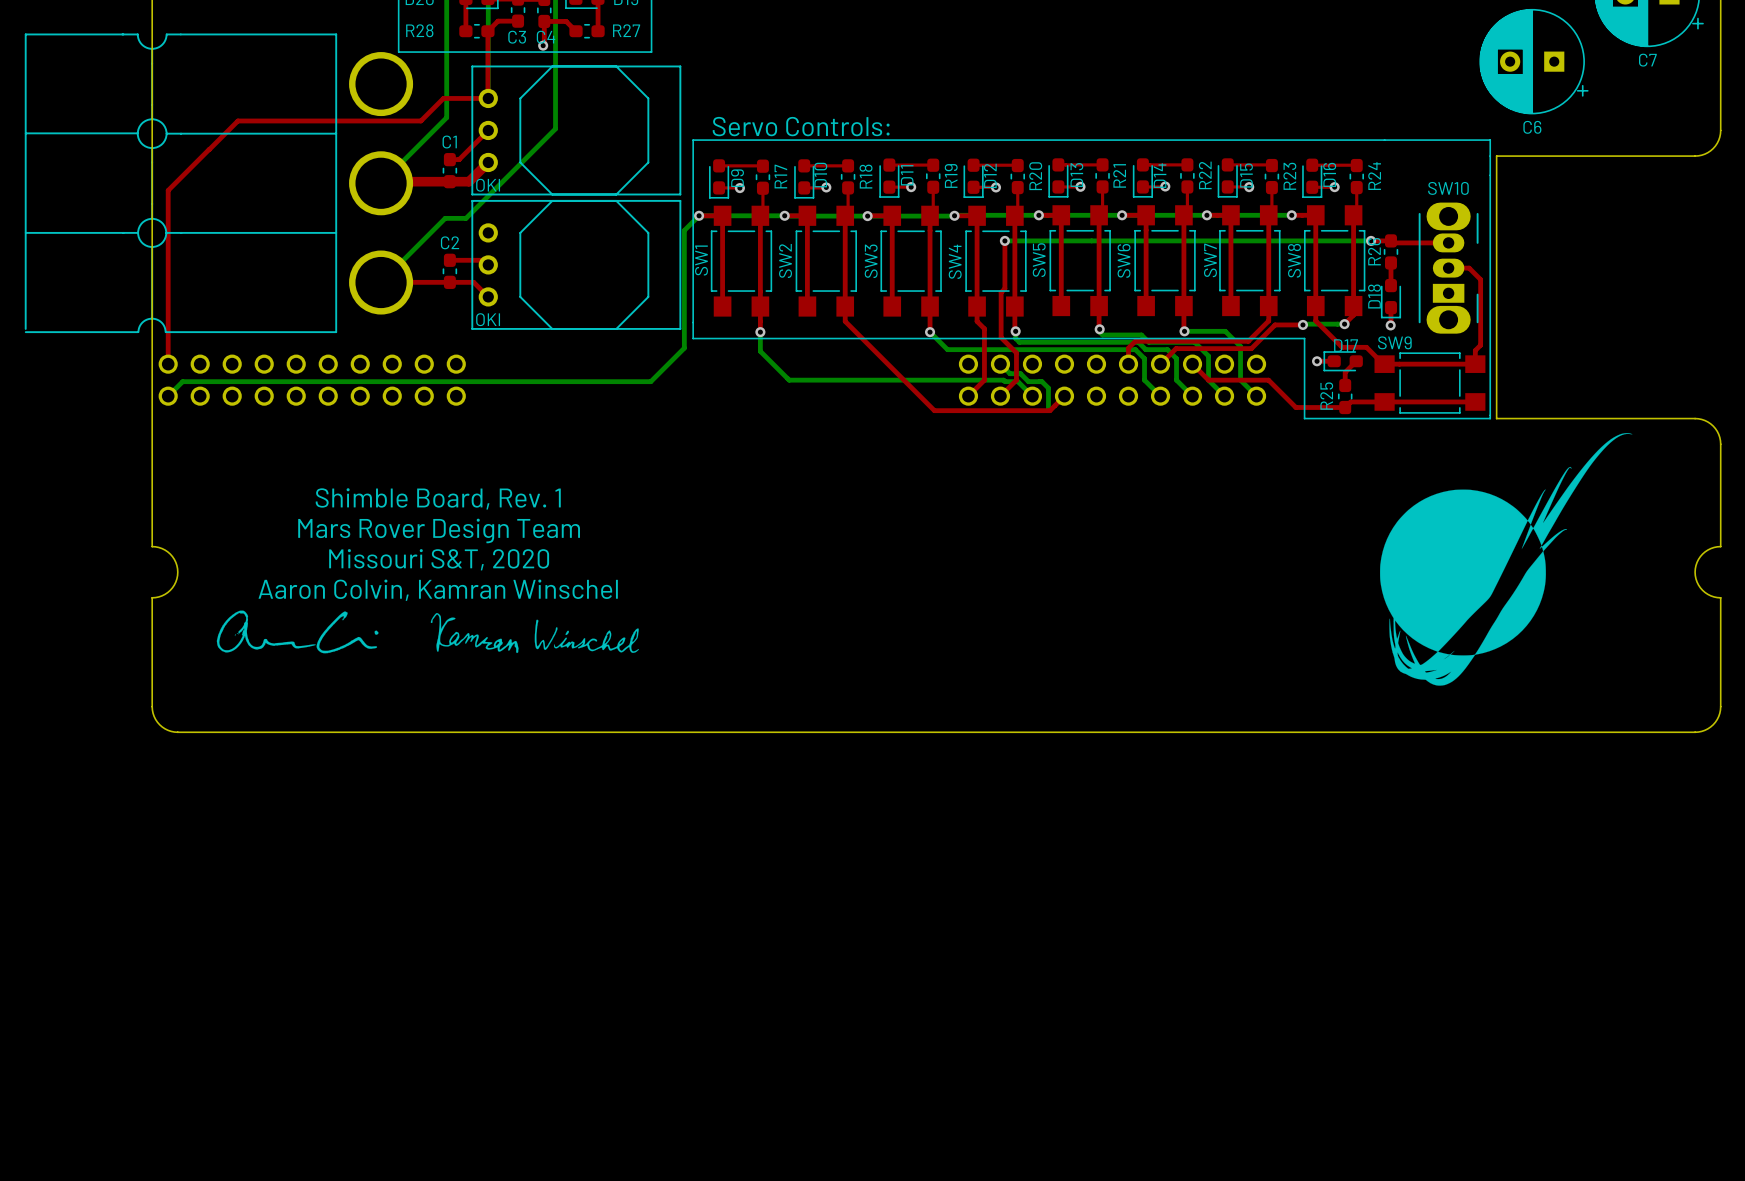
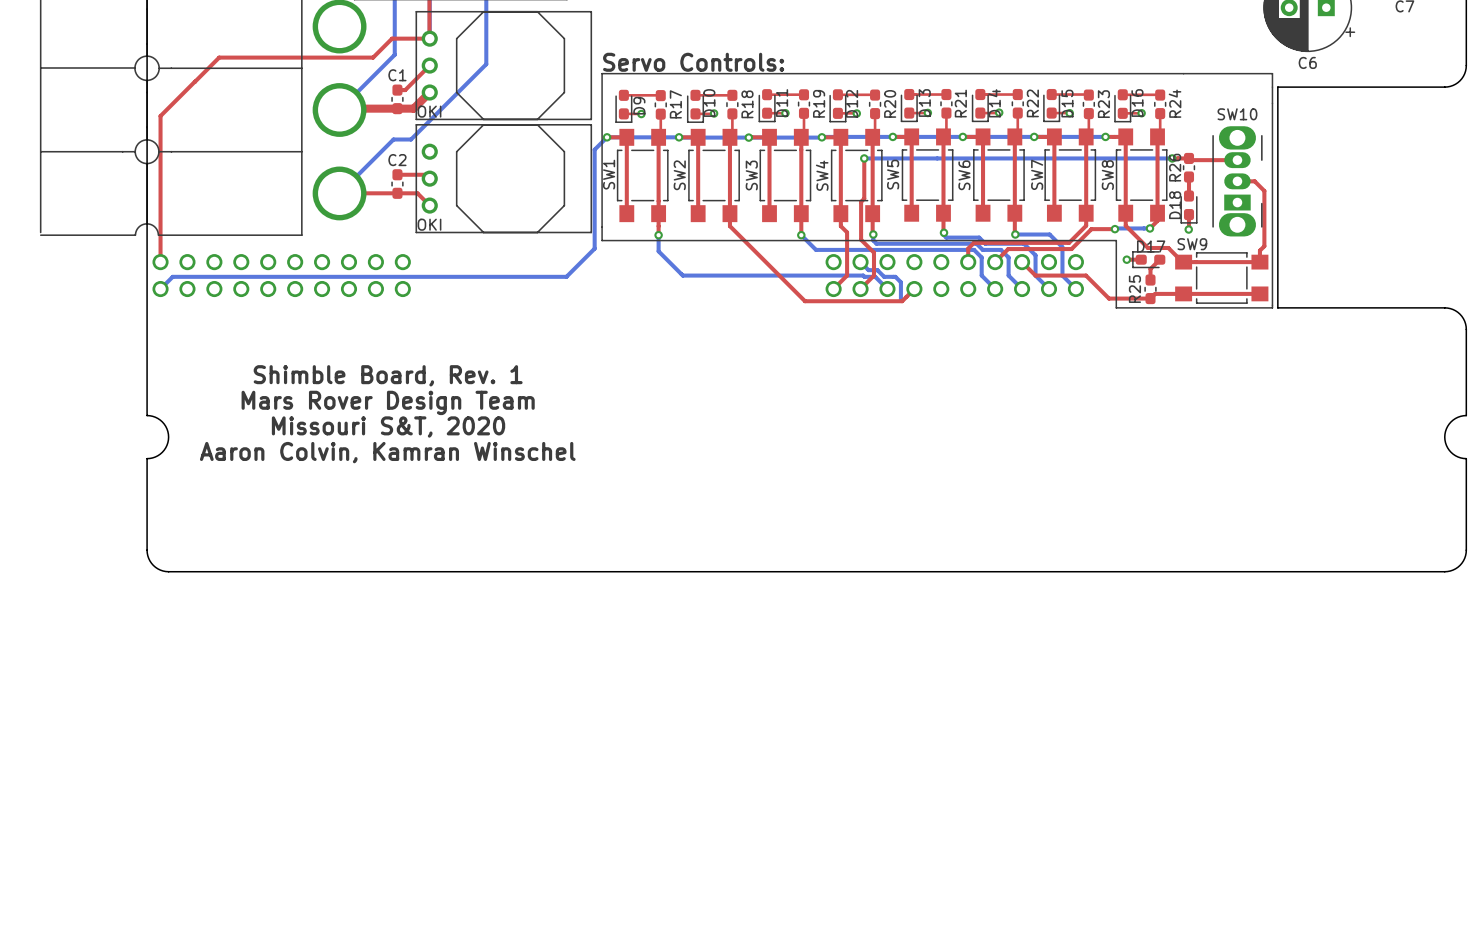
drawing: [1380, 433, 1633, 686] -> none
drawing: [216, 610, 379, 654] -> none
drawing: [430, 613, 640, 654] -> none

